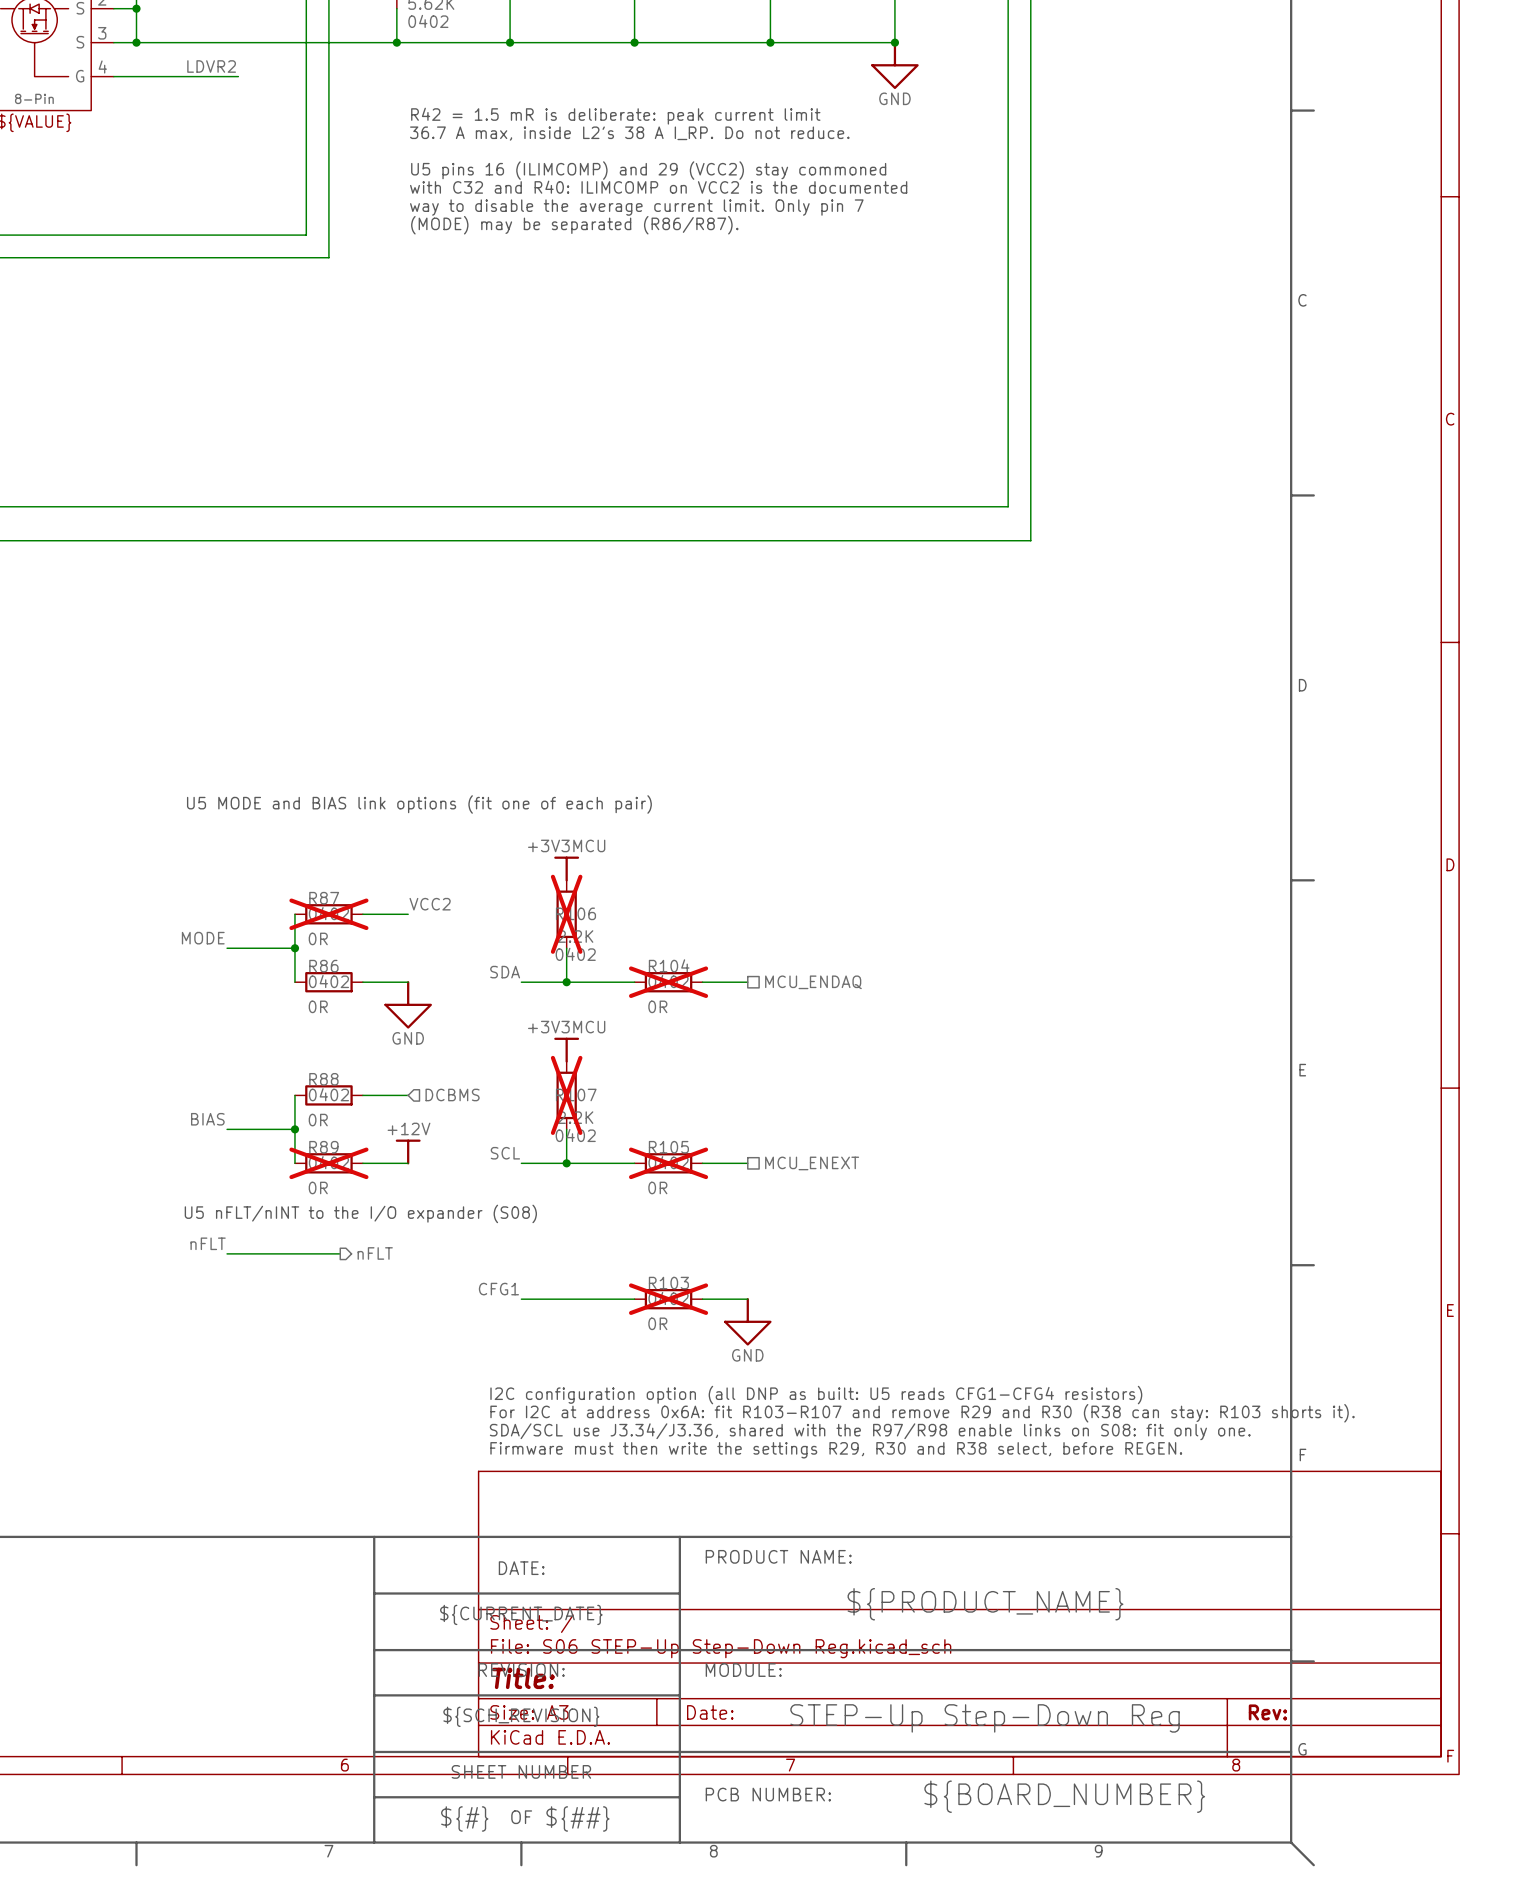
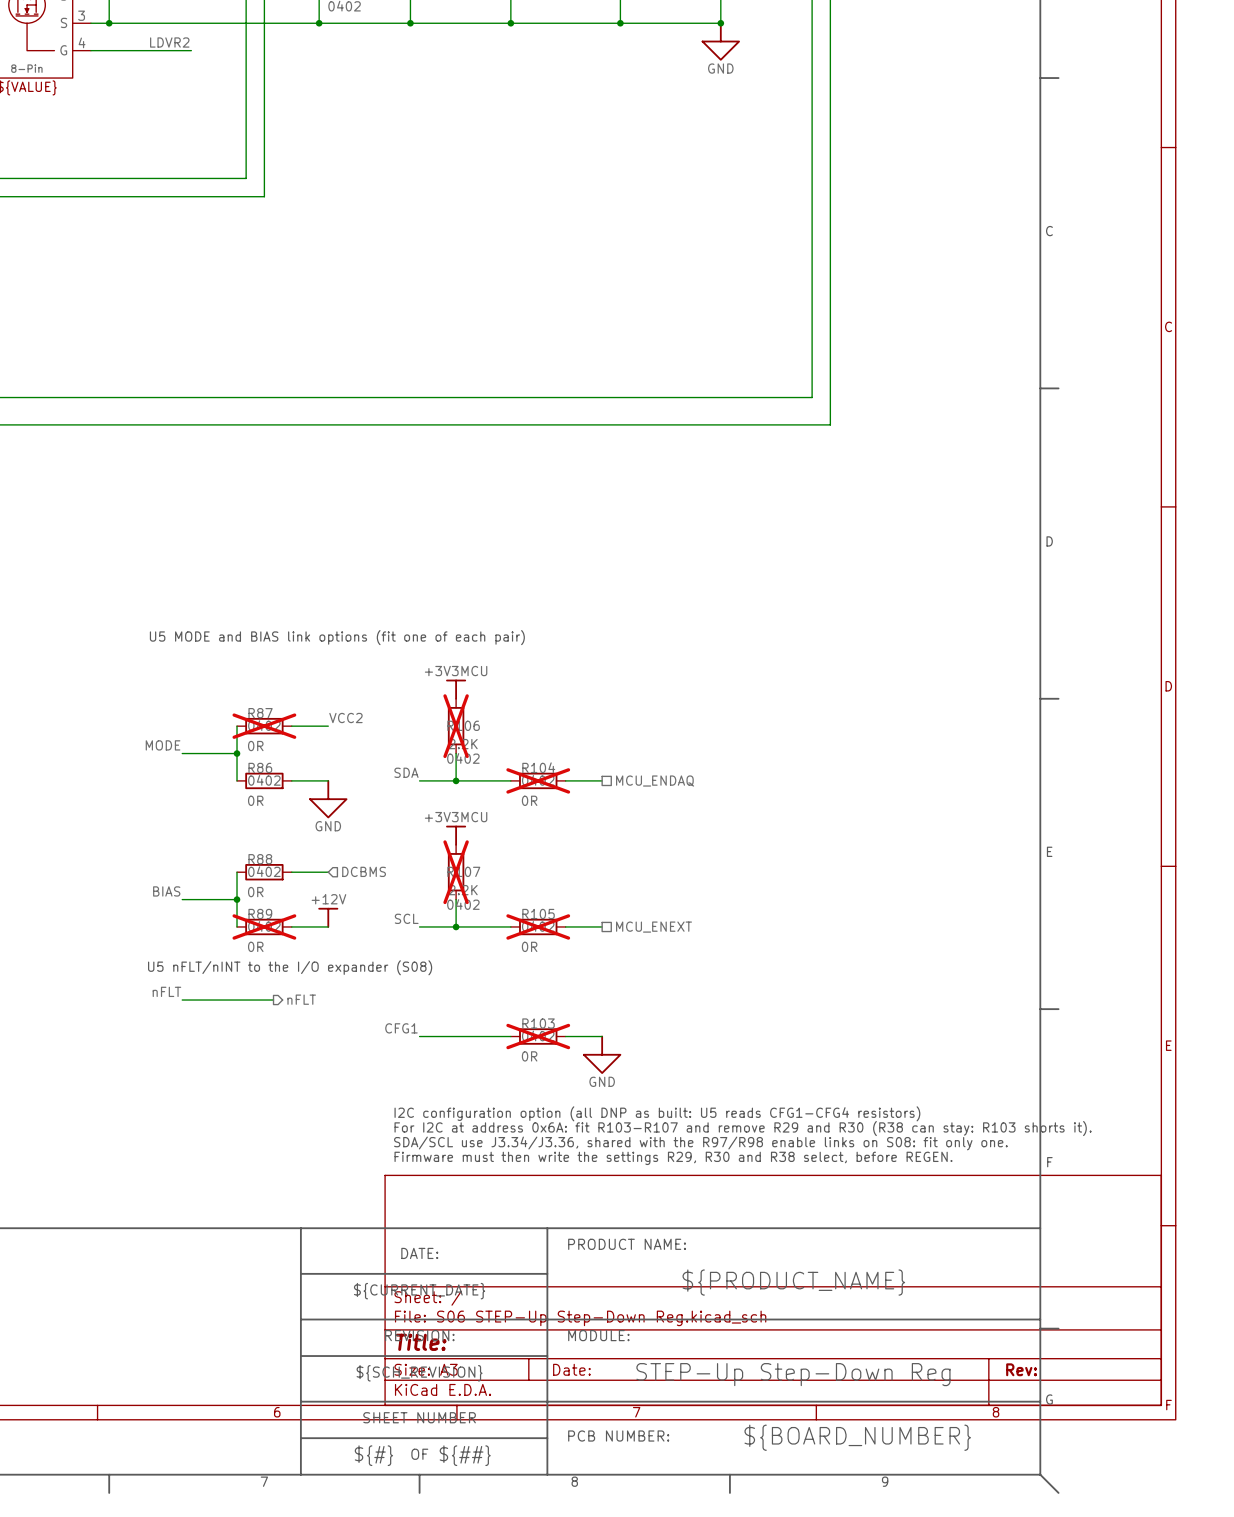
text: R42 = 1.5 mR is deliberate: peak current limit (615, 116) -> none
text: 36.7 A max, inside L2's 38 A I_RP. Do not reduce. (629, 133) -> none
text: U5 pins 16 (ILIMCOMP) and 29 (VCC2) stay commoned (648, 170) -> none
text: with C32 and R40: ILIMCOMP on VCC2 is the documented (658, 187) -> none
text: way to disable the average current limit. Only pin 7 (636, 207) -> none
text: (MODE) may be separated (R86/R87). (574, 225) -> none

